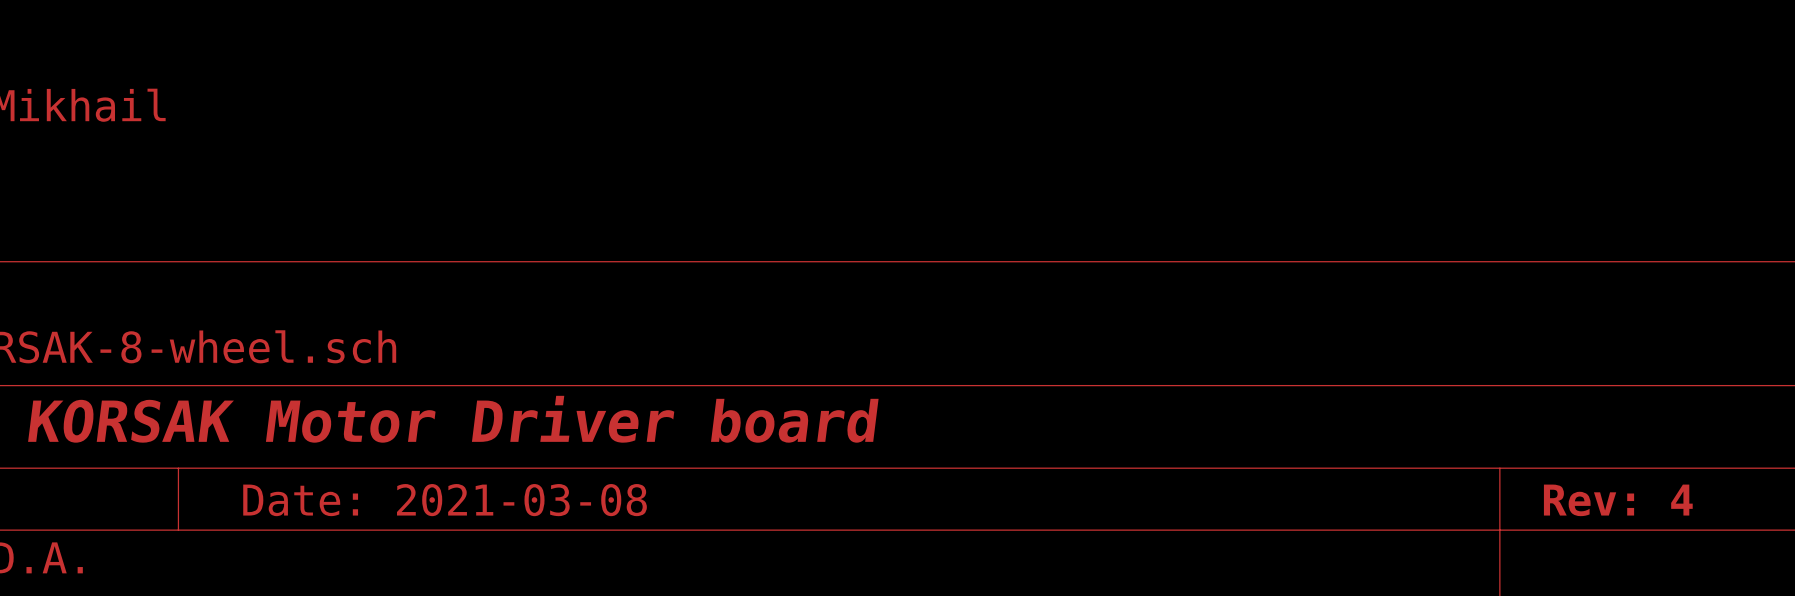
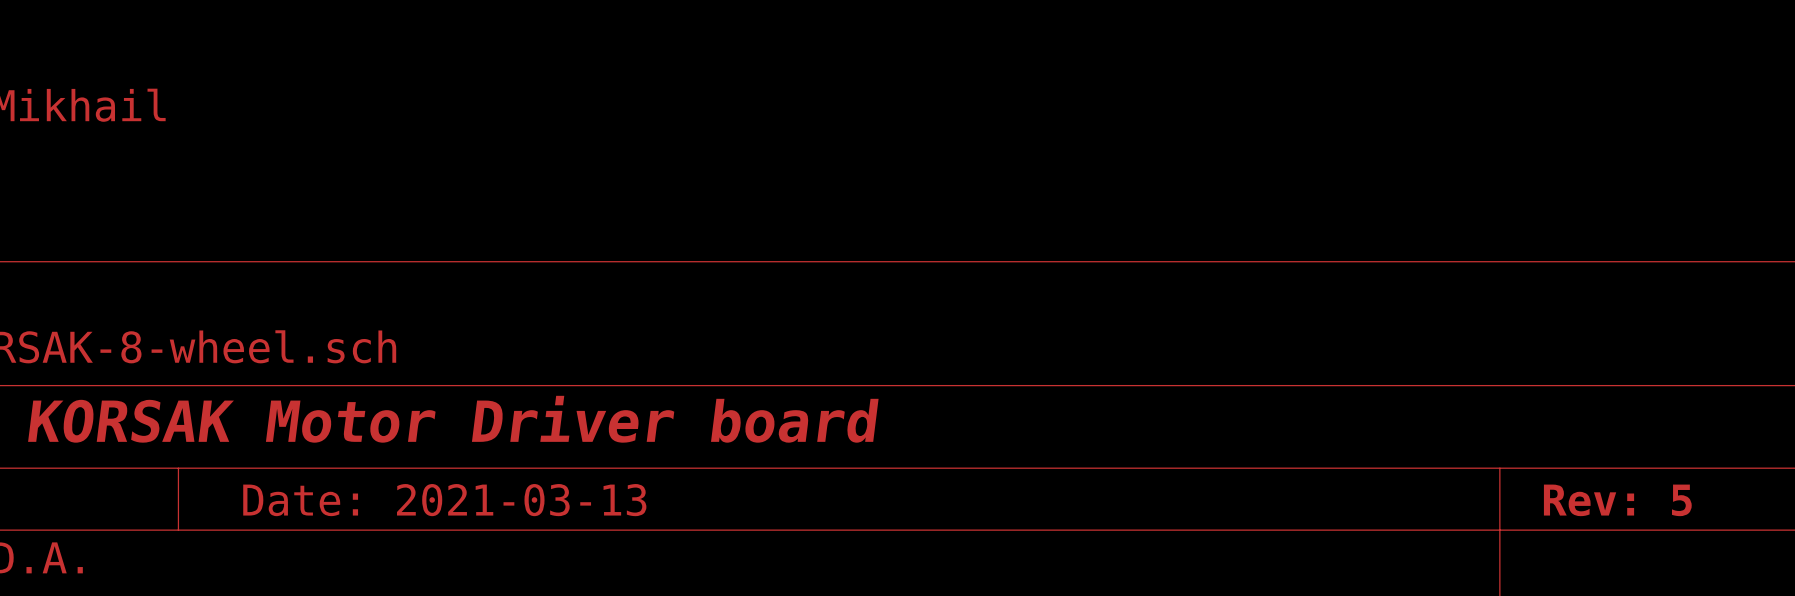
title block: Date: 2021-03-08 (445, 500) -> Date: 2021-03-13 (444, 500)
title block: Rev: 4 (1618, 500) -> Rev: 5 (1617, 500)

